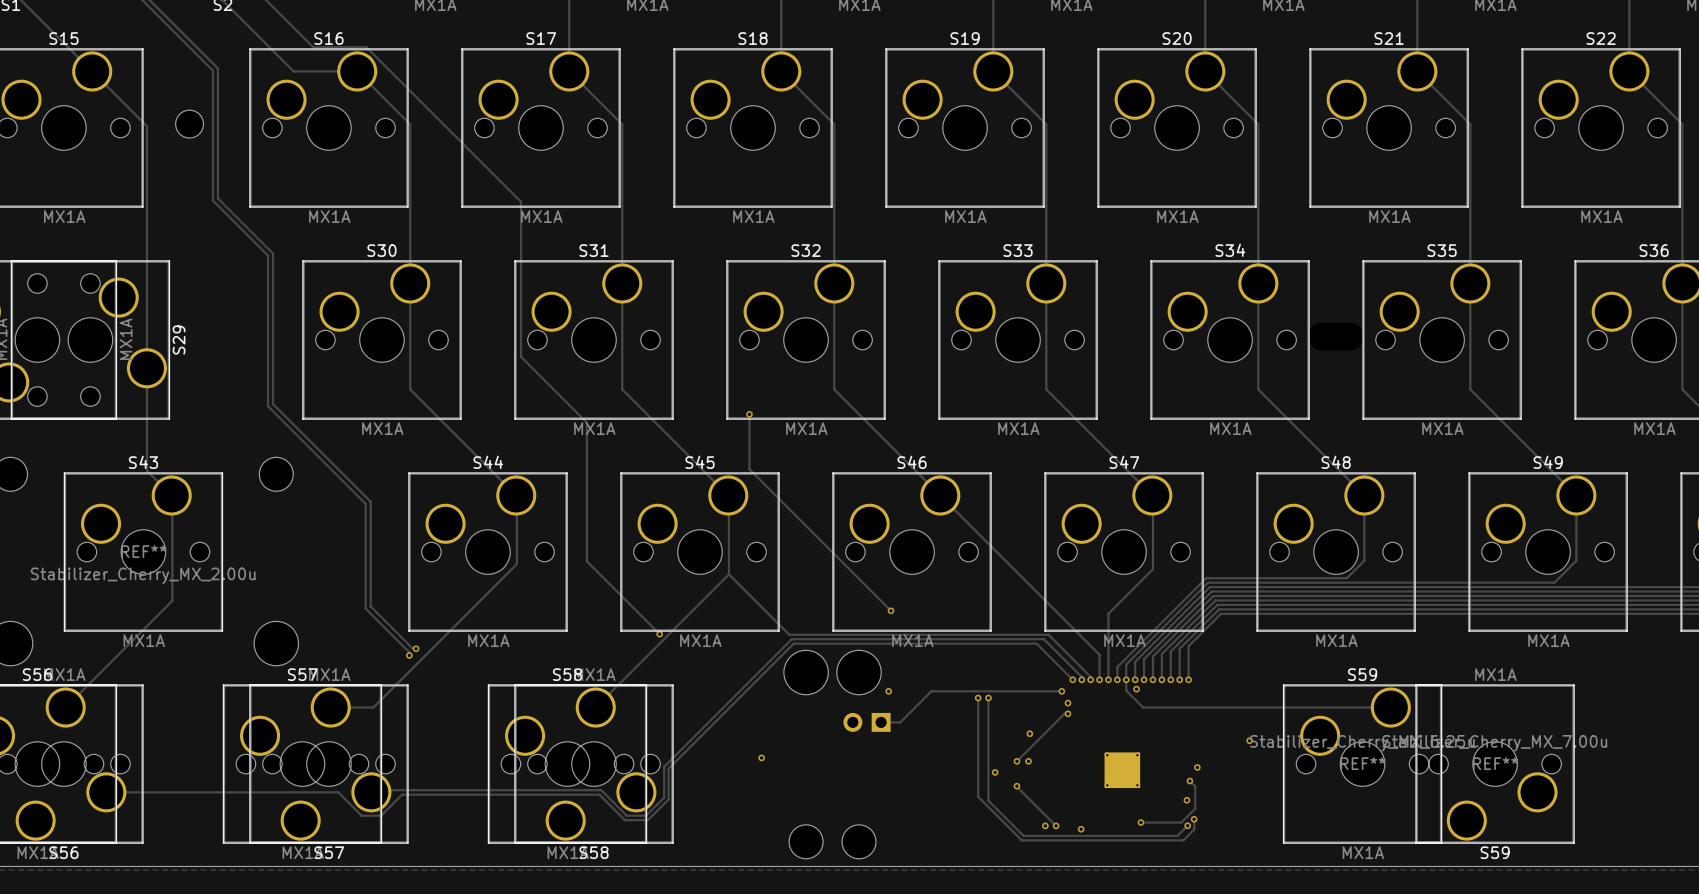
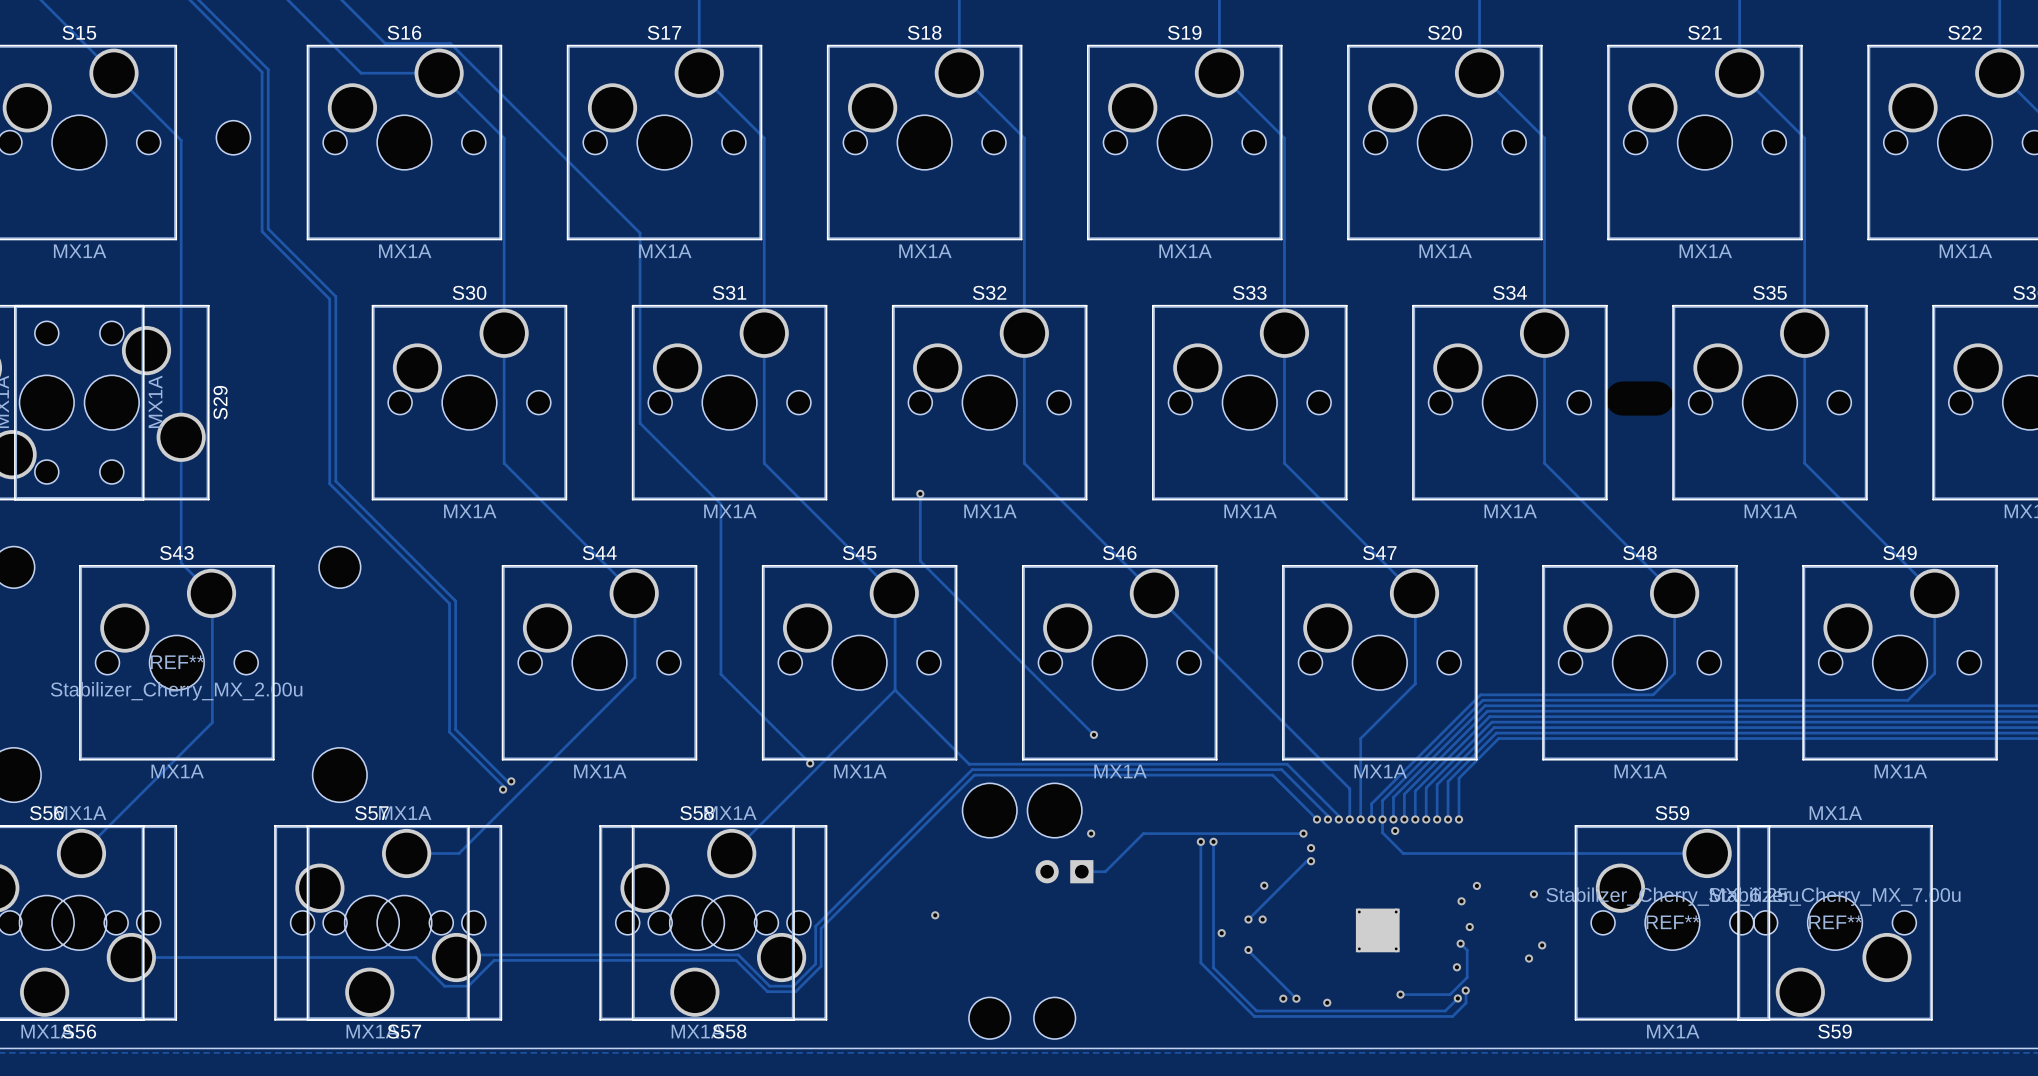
via: none -> (1476, 885)
via: none -> (1461, 901)
via: none -> (1542, 945)
via: none -> (1529, 958)

